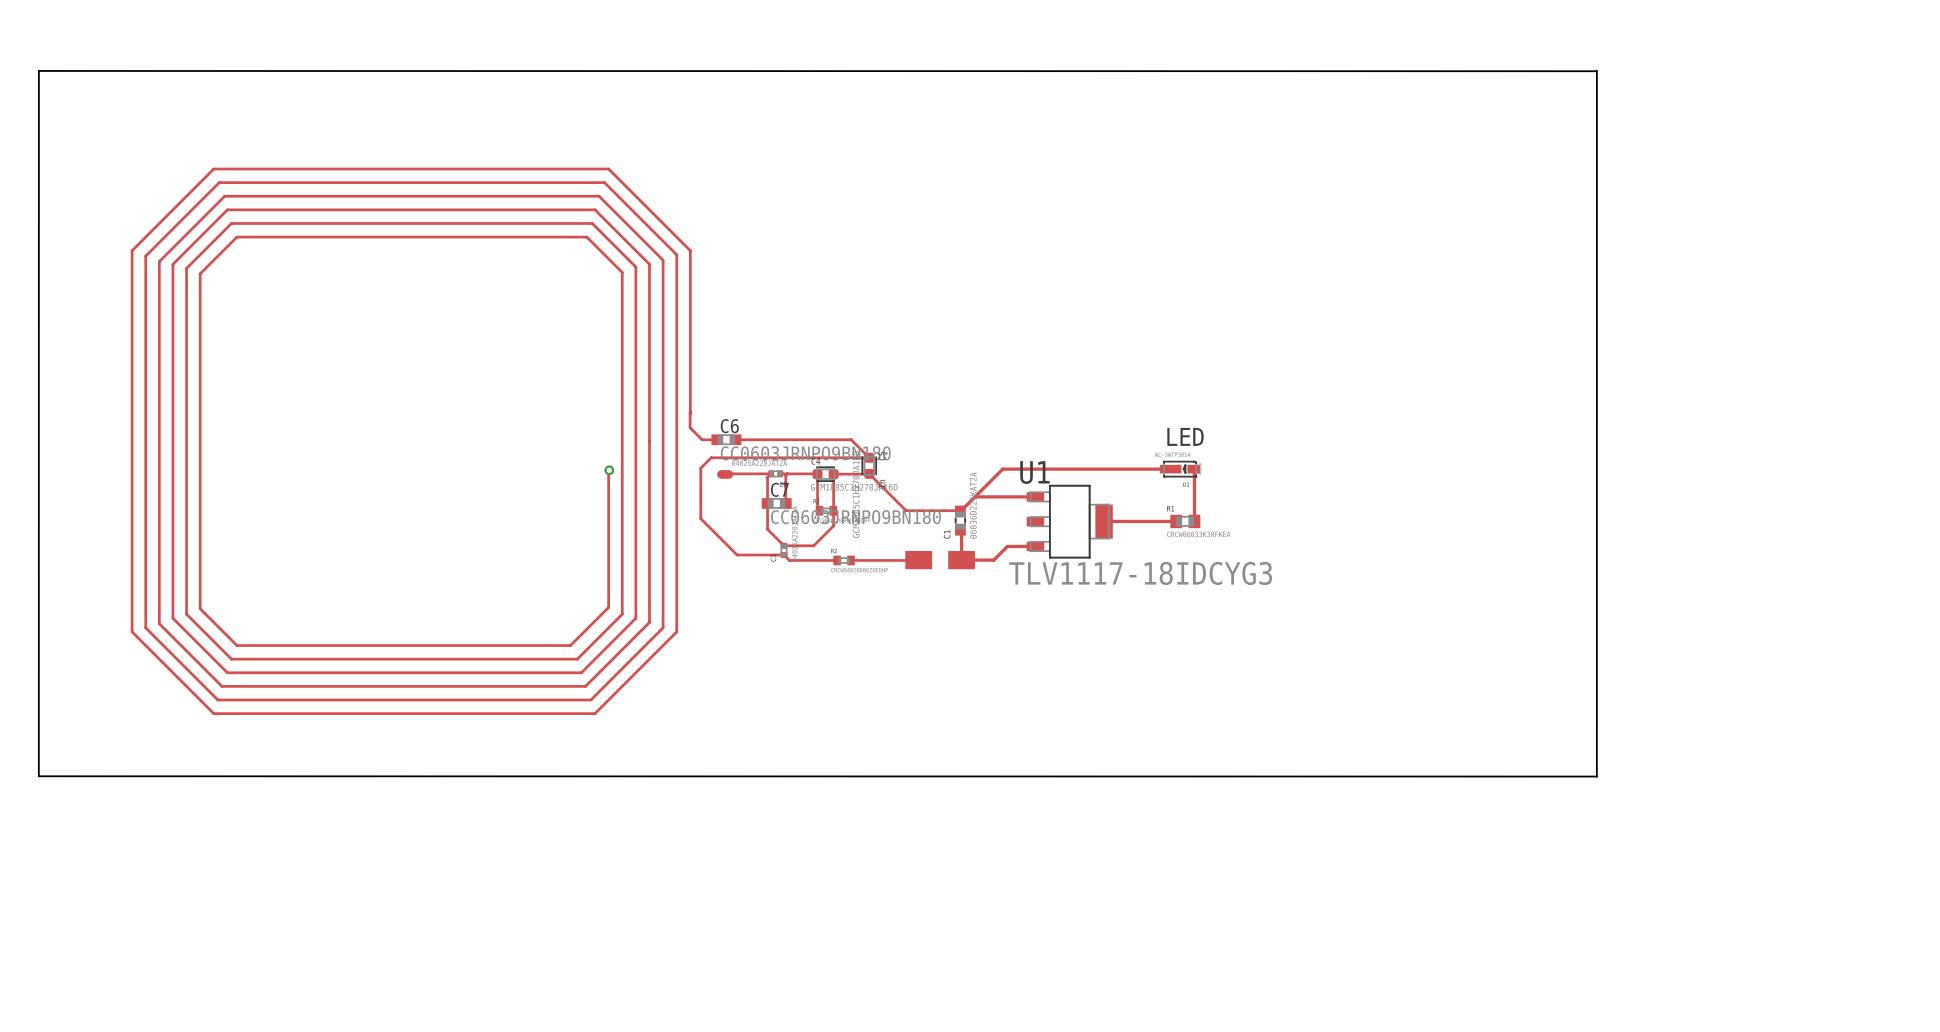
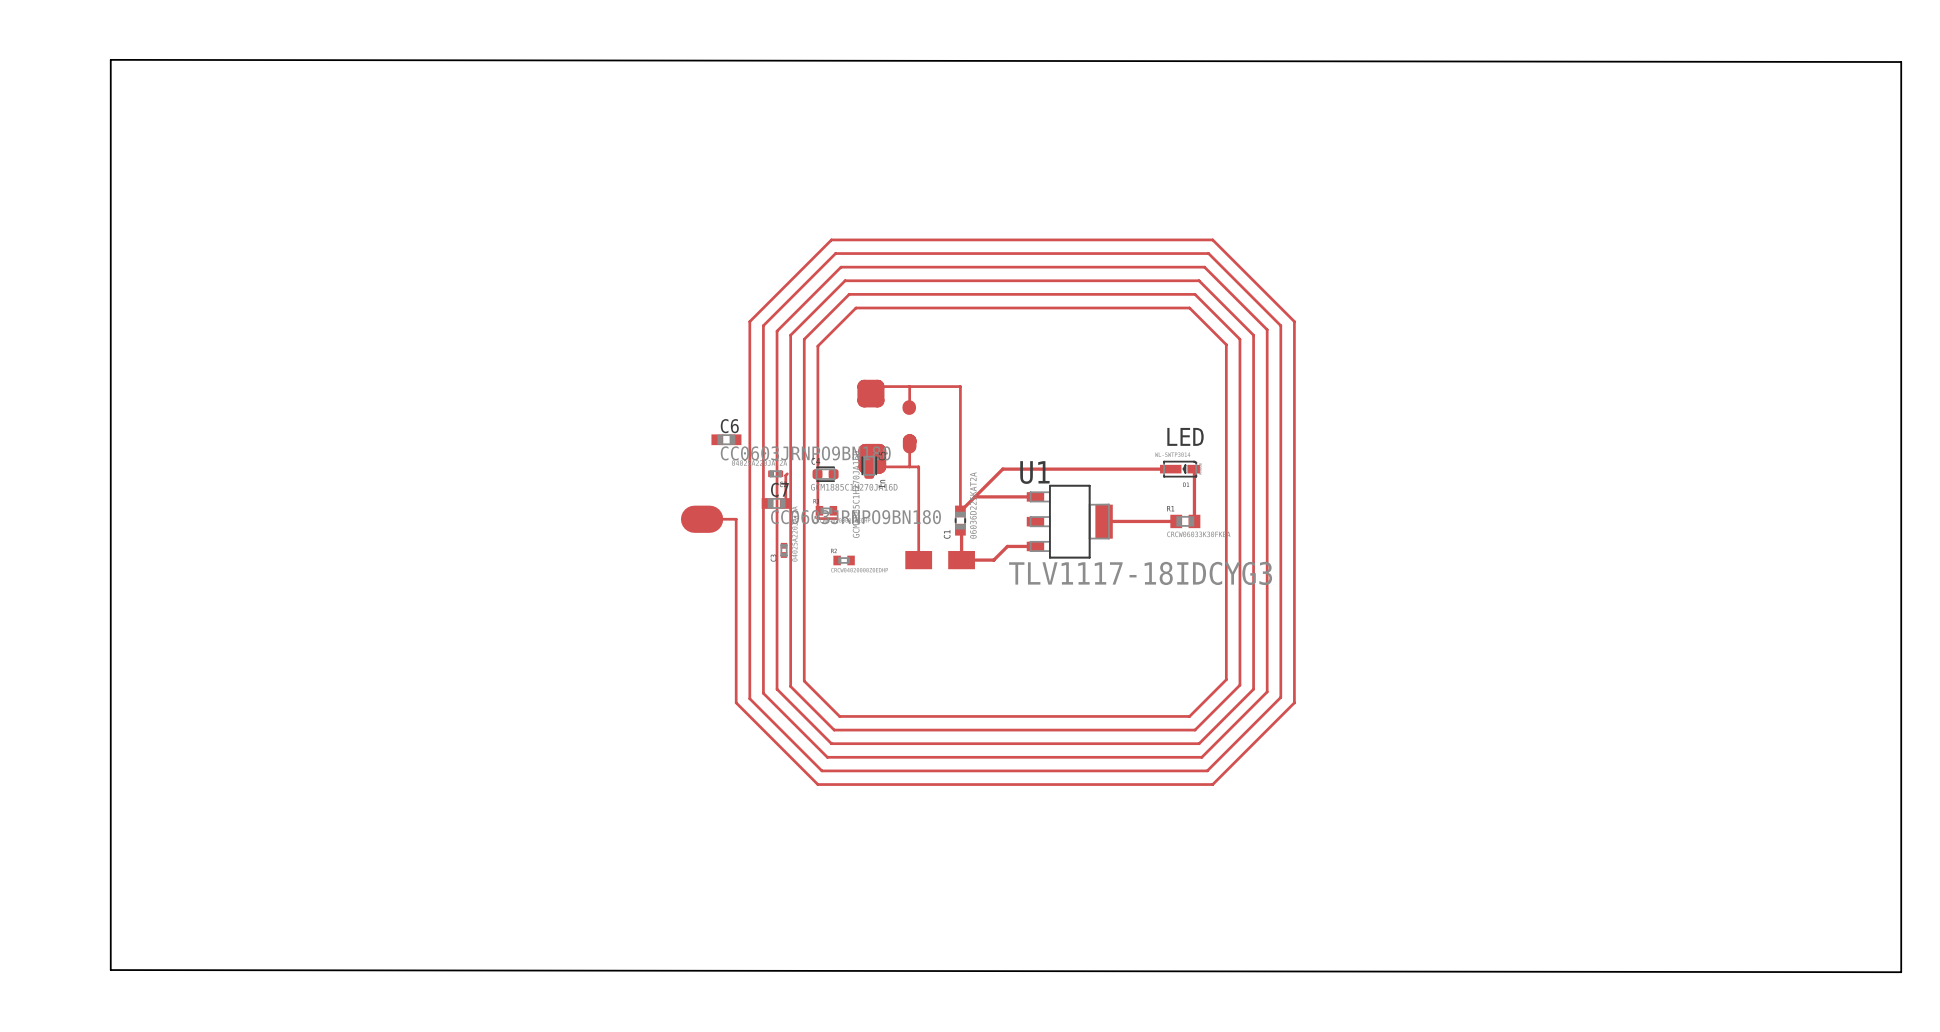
board edge: (38, 70) (1596, 71) (1596, 776) (38, 776) (38, 70) -> (110, 59) (110, 970) (1901, 972) (1901, 62) (110, 59)
track: none -> (877, 386) (960, 386) (960, 511)
track: none -> (877, 386) (864, 386) (864, 400) (877, 400) (877, 386)
track: none -> (909, 386) (909, 408)
track: (690, 412) (690, 427) (702, 439) (717, 439) -> none
track: (690, 414) (690, 250) (608, 169) (213, 169) (132, 250) (132, 631) (213, 713) (595, 713) (676, 631) (676, 254) (604, 182) (219, 182) (145, 256) (145, 627) (217, 700) (590, 700) (663, 627) (663, 260) (599, 196) (224, 196) (159, 261) (159, 623) (221, 686) (585, 686) (649, 622) (649, 264) (595, 209) (227, 209) (172, 264) (172, 618) (227, 672) (581, 672) (635, 618) (635, 267) (592, 223) (231, 223) (186, 268) (186, 614) (231, 659) (577, 659) (622, 614) (622, 272) (586, 237) (236, 237) (200, 273) (200, 608) (236, 645) (570, 645) (608, 607) (608, 468) -> none
track: (735, 439) (851, 439) (869, 457) (711, 457) (700, 468) (700, 518) (737, 555) (784, 555) (789, 560) (837, 560) -> none
track: none -> (909, 440) (909, 466)
track: none -> (865, 466) (879, 466) (879, 450) (865, 450) (865, 466)
via: (609, 470) -> none
track: (780, 473) (817, 473) (817, 510) (819, 510) -> none
track: (833, 474) (833, 525) (813, 545) (784, 545) (767, 529) (767, 477) (771, 473) (721, 474) -> none
track: (833, 474) (869, 473) (906, 510) (961, 510) -> none
track: none -> (837, 518) (817, 518) (817, 346) (856, 308) (1189, 308) (1226, 344) (1226, 679) (1189, 716) (839, 716) (804, 681) (804, 339) (849, 294) (1195, 294) (1239, 339) (1239, 685) (1195, 730) (834, 730) (790, 686) (790, 335) (845, 280) (1199, 280) (1253, 335) (1253, 689) (1199, 743) (831, 743) (777, 689) (777, 331) (841, 267) (1204, 267) (1267, 329) (1267, 691) (1201, 757) (827, 757) (763, 693) (763, 325) (835, 253) (1208, 253) (1280, 325) (1280, 697) (1207, 770) (821, 770) (749, 698) (749, 321) (831, 239) (1212, 239) (1294, 321) (1294, 702) (1212, 784) (817, 784) (736, 702) (736, 519) (694, 519)
track: (918, 560) (851, 560) -> (918, 560) (918, 466) (877, 466)

